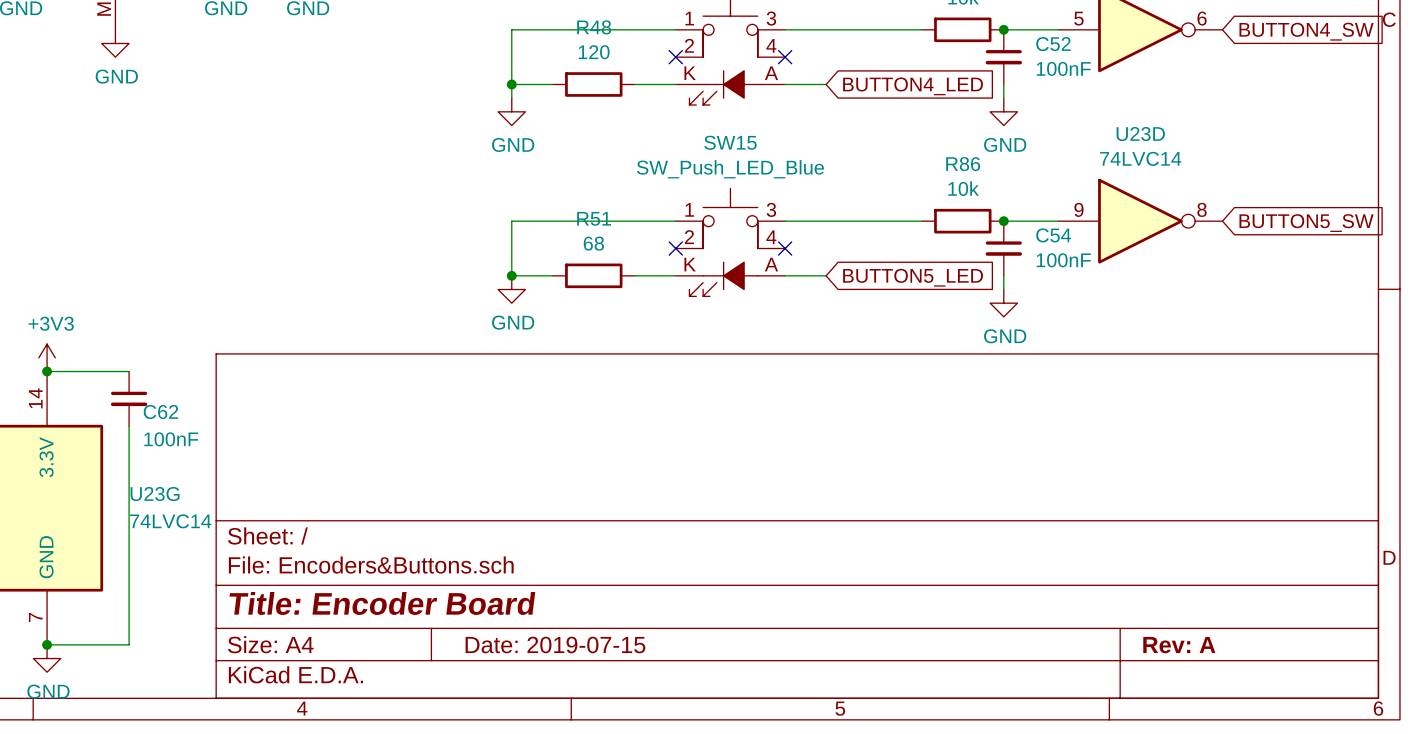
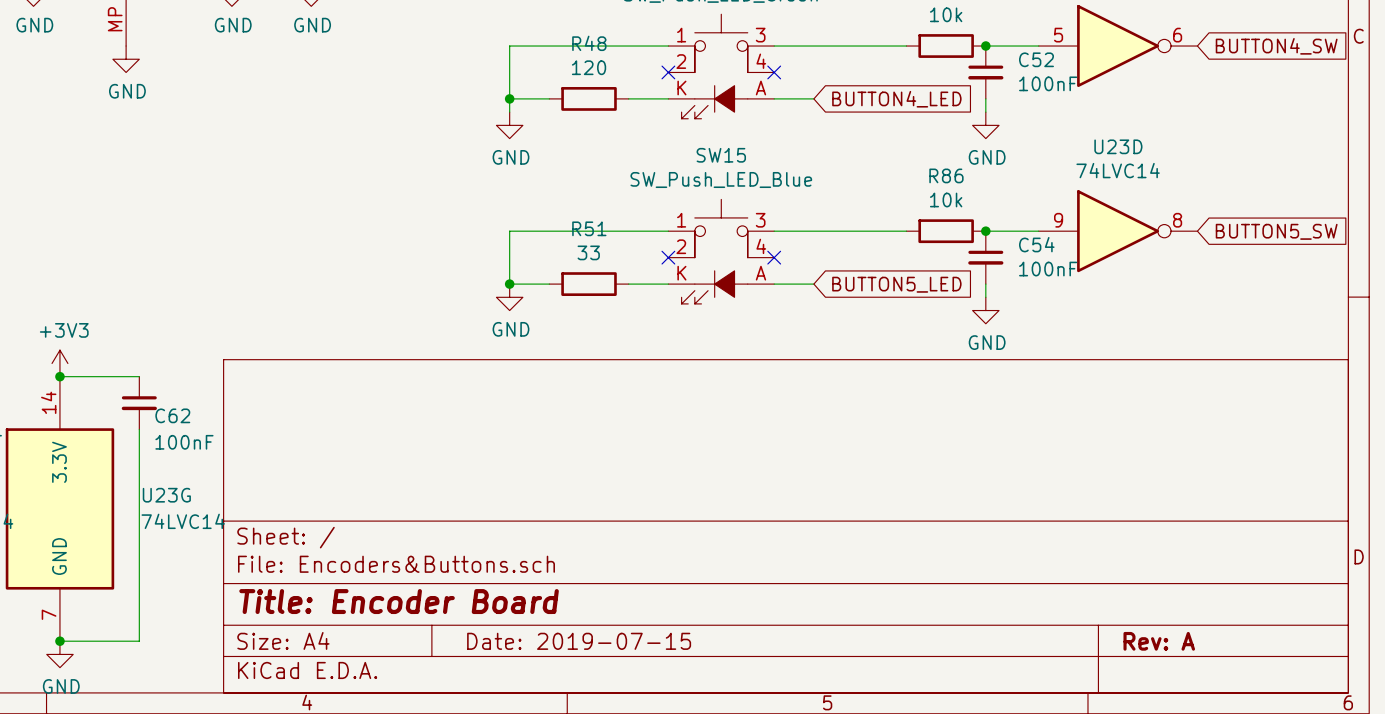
R51 value: 68 (593, 243) -> 33 (588, 252)

